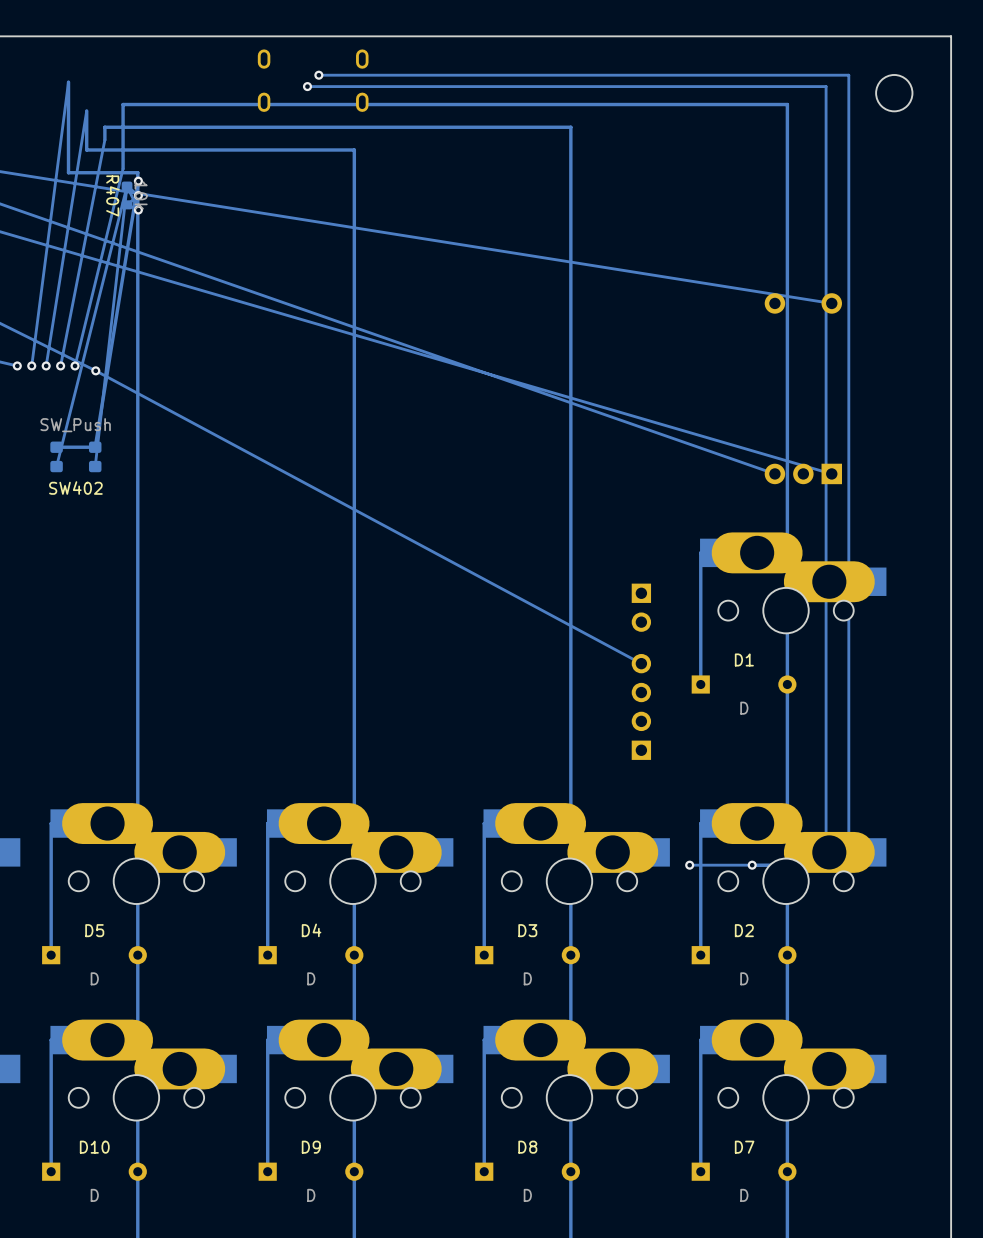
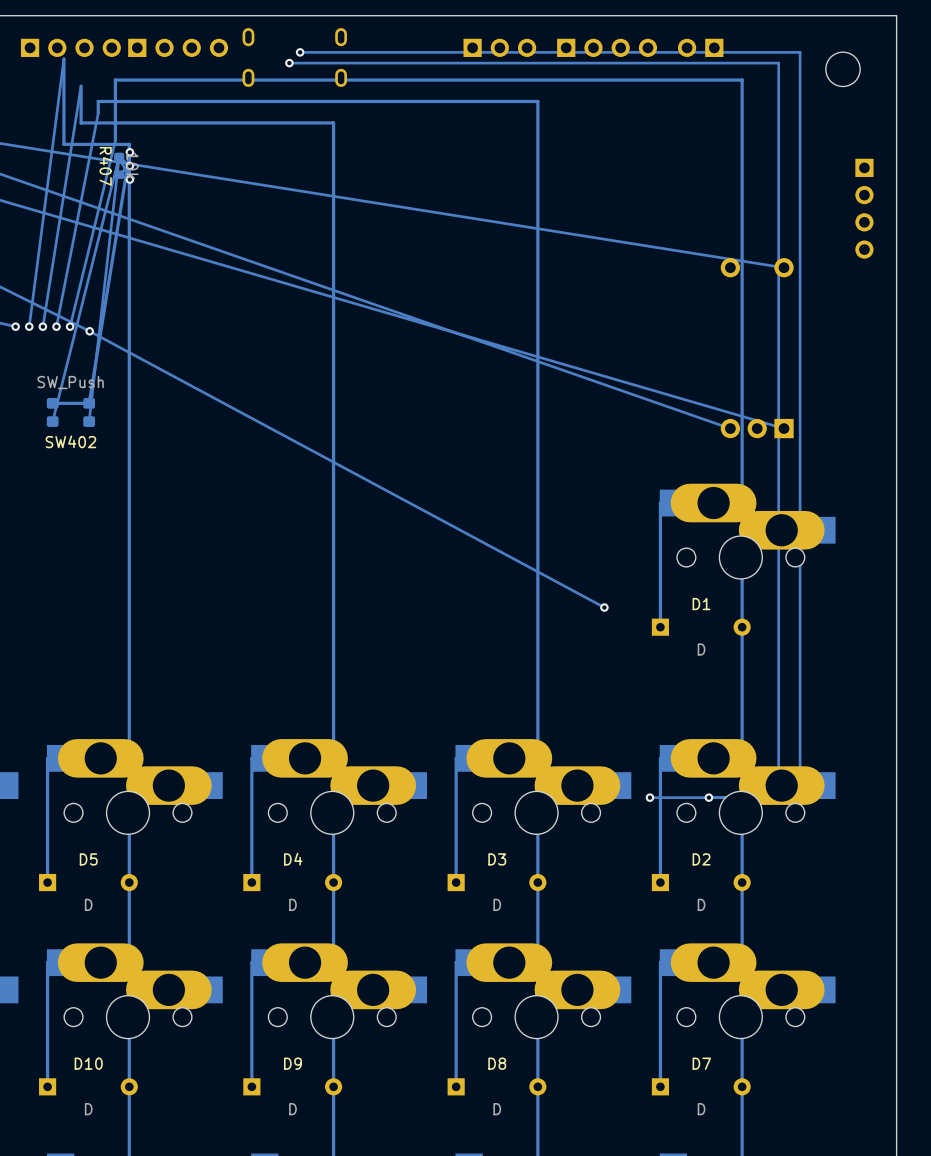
part: none -> (70, 47)
part: none -> (178, 47)
part: none -> (499, 47)
part: none -> (607, 47)
part: none -> (700, 47)
part: none -> (864, 208)
part: (641, 607) -> none
via: none -> (604, 607)
part: (641, 706) -> none

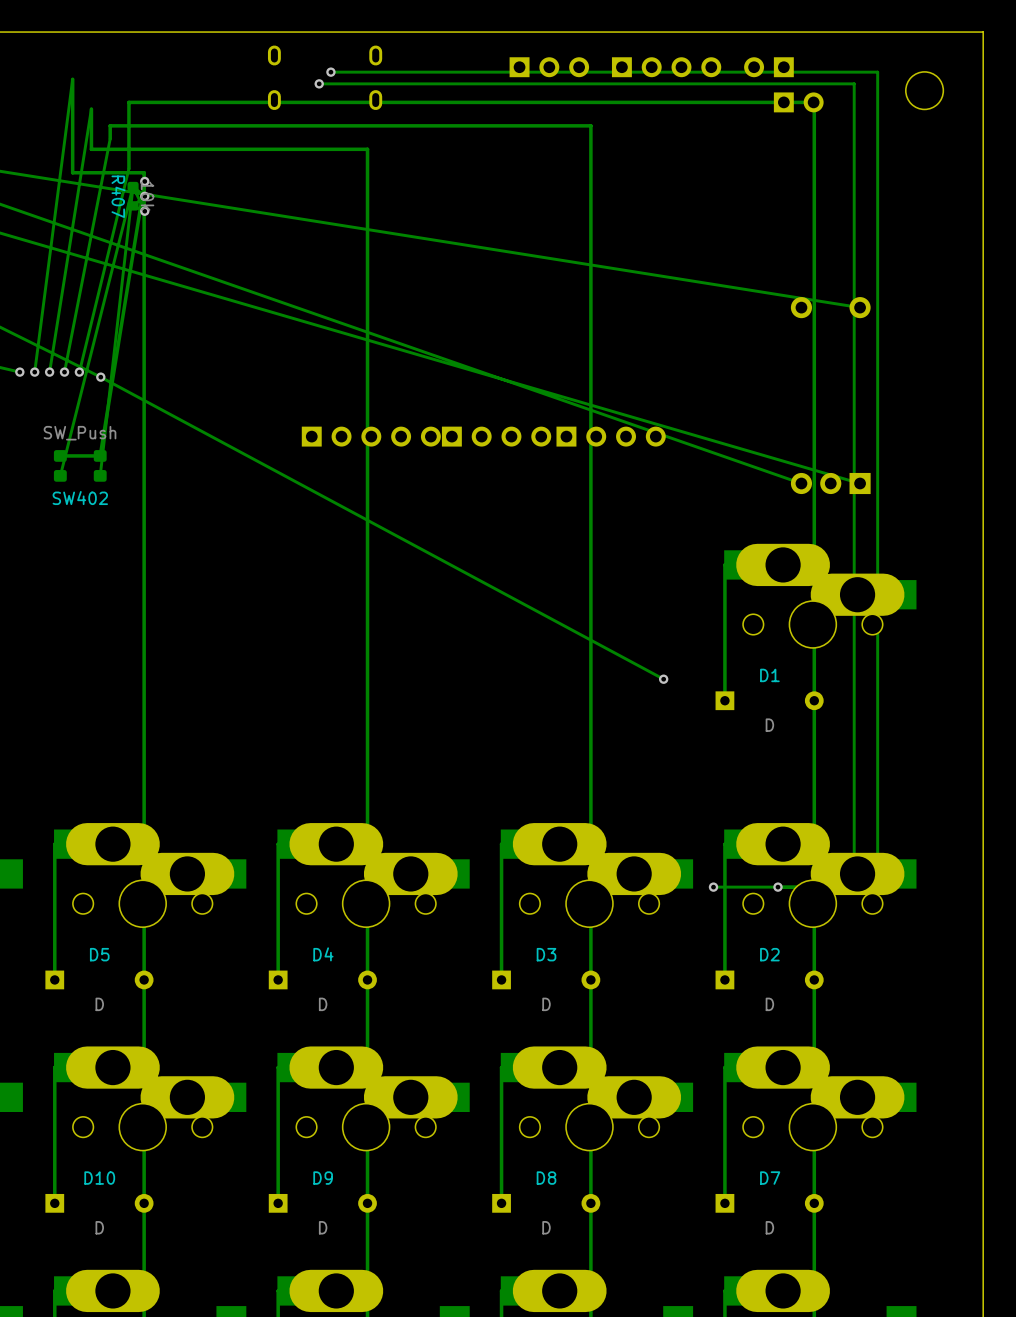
part: (70, 47) -> none
part: (178, 47) -> none
part: none -> (798, 102)
part: (864, 208) -> none
part: none -> (371, 436)
part: none -> (496, 436)
part: none -> (611, 436)

